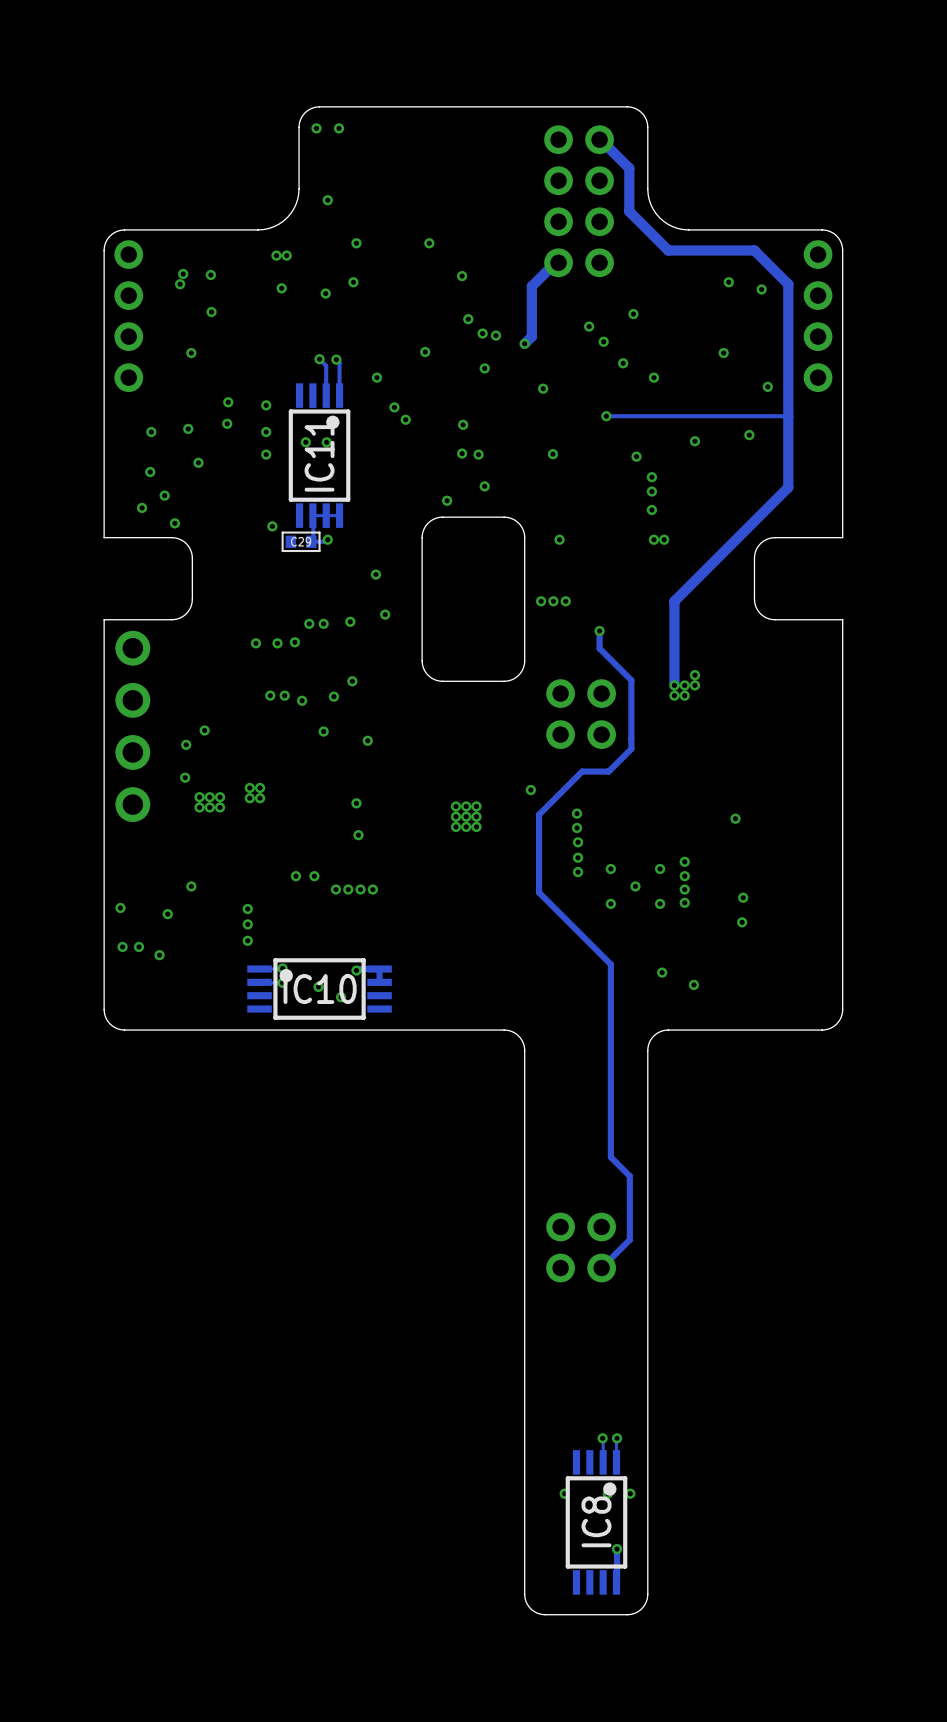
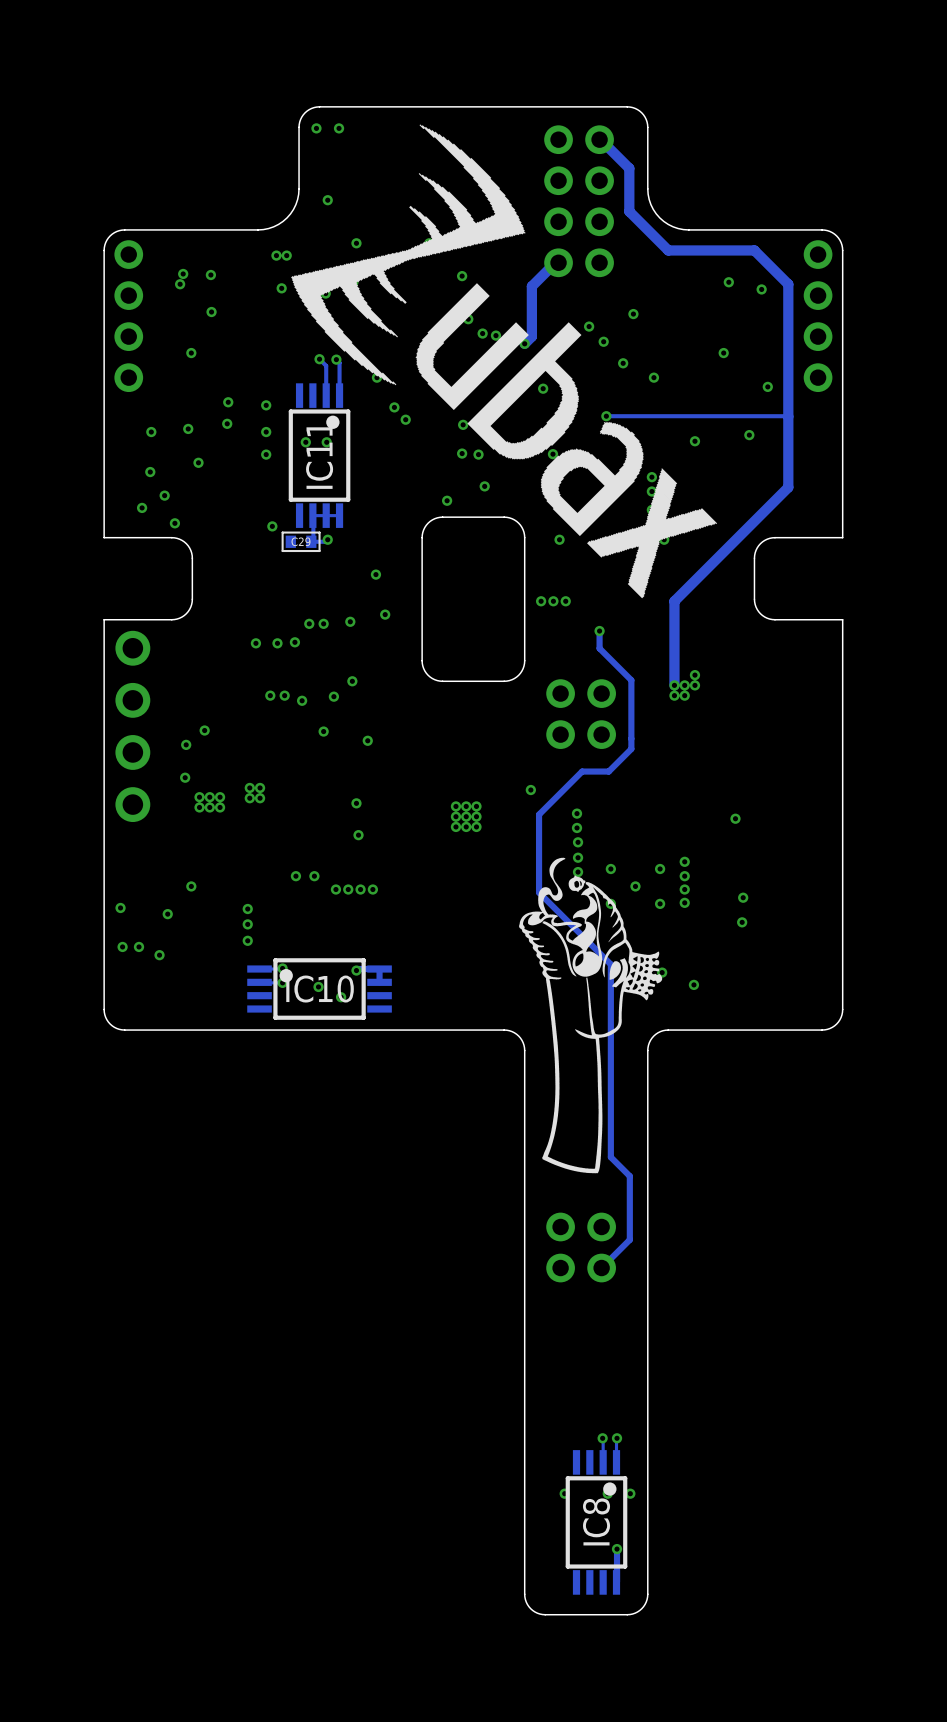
drawing: none -> [291, 124, 718, 599]
drawing: none -> [519, 857, 663, 1174]

